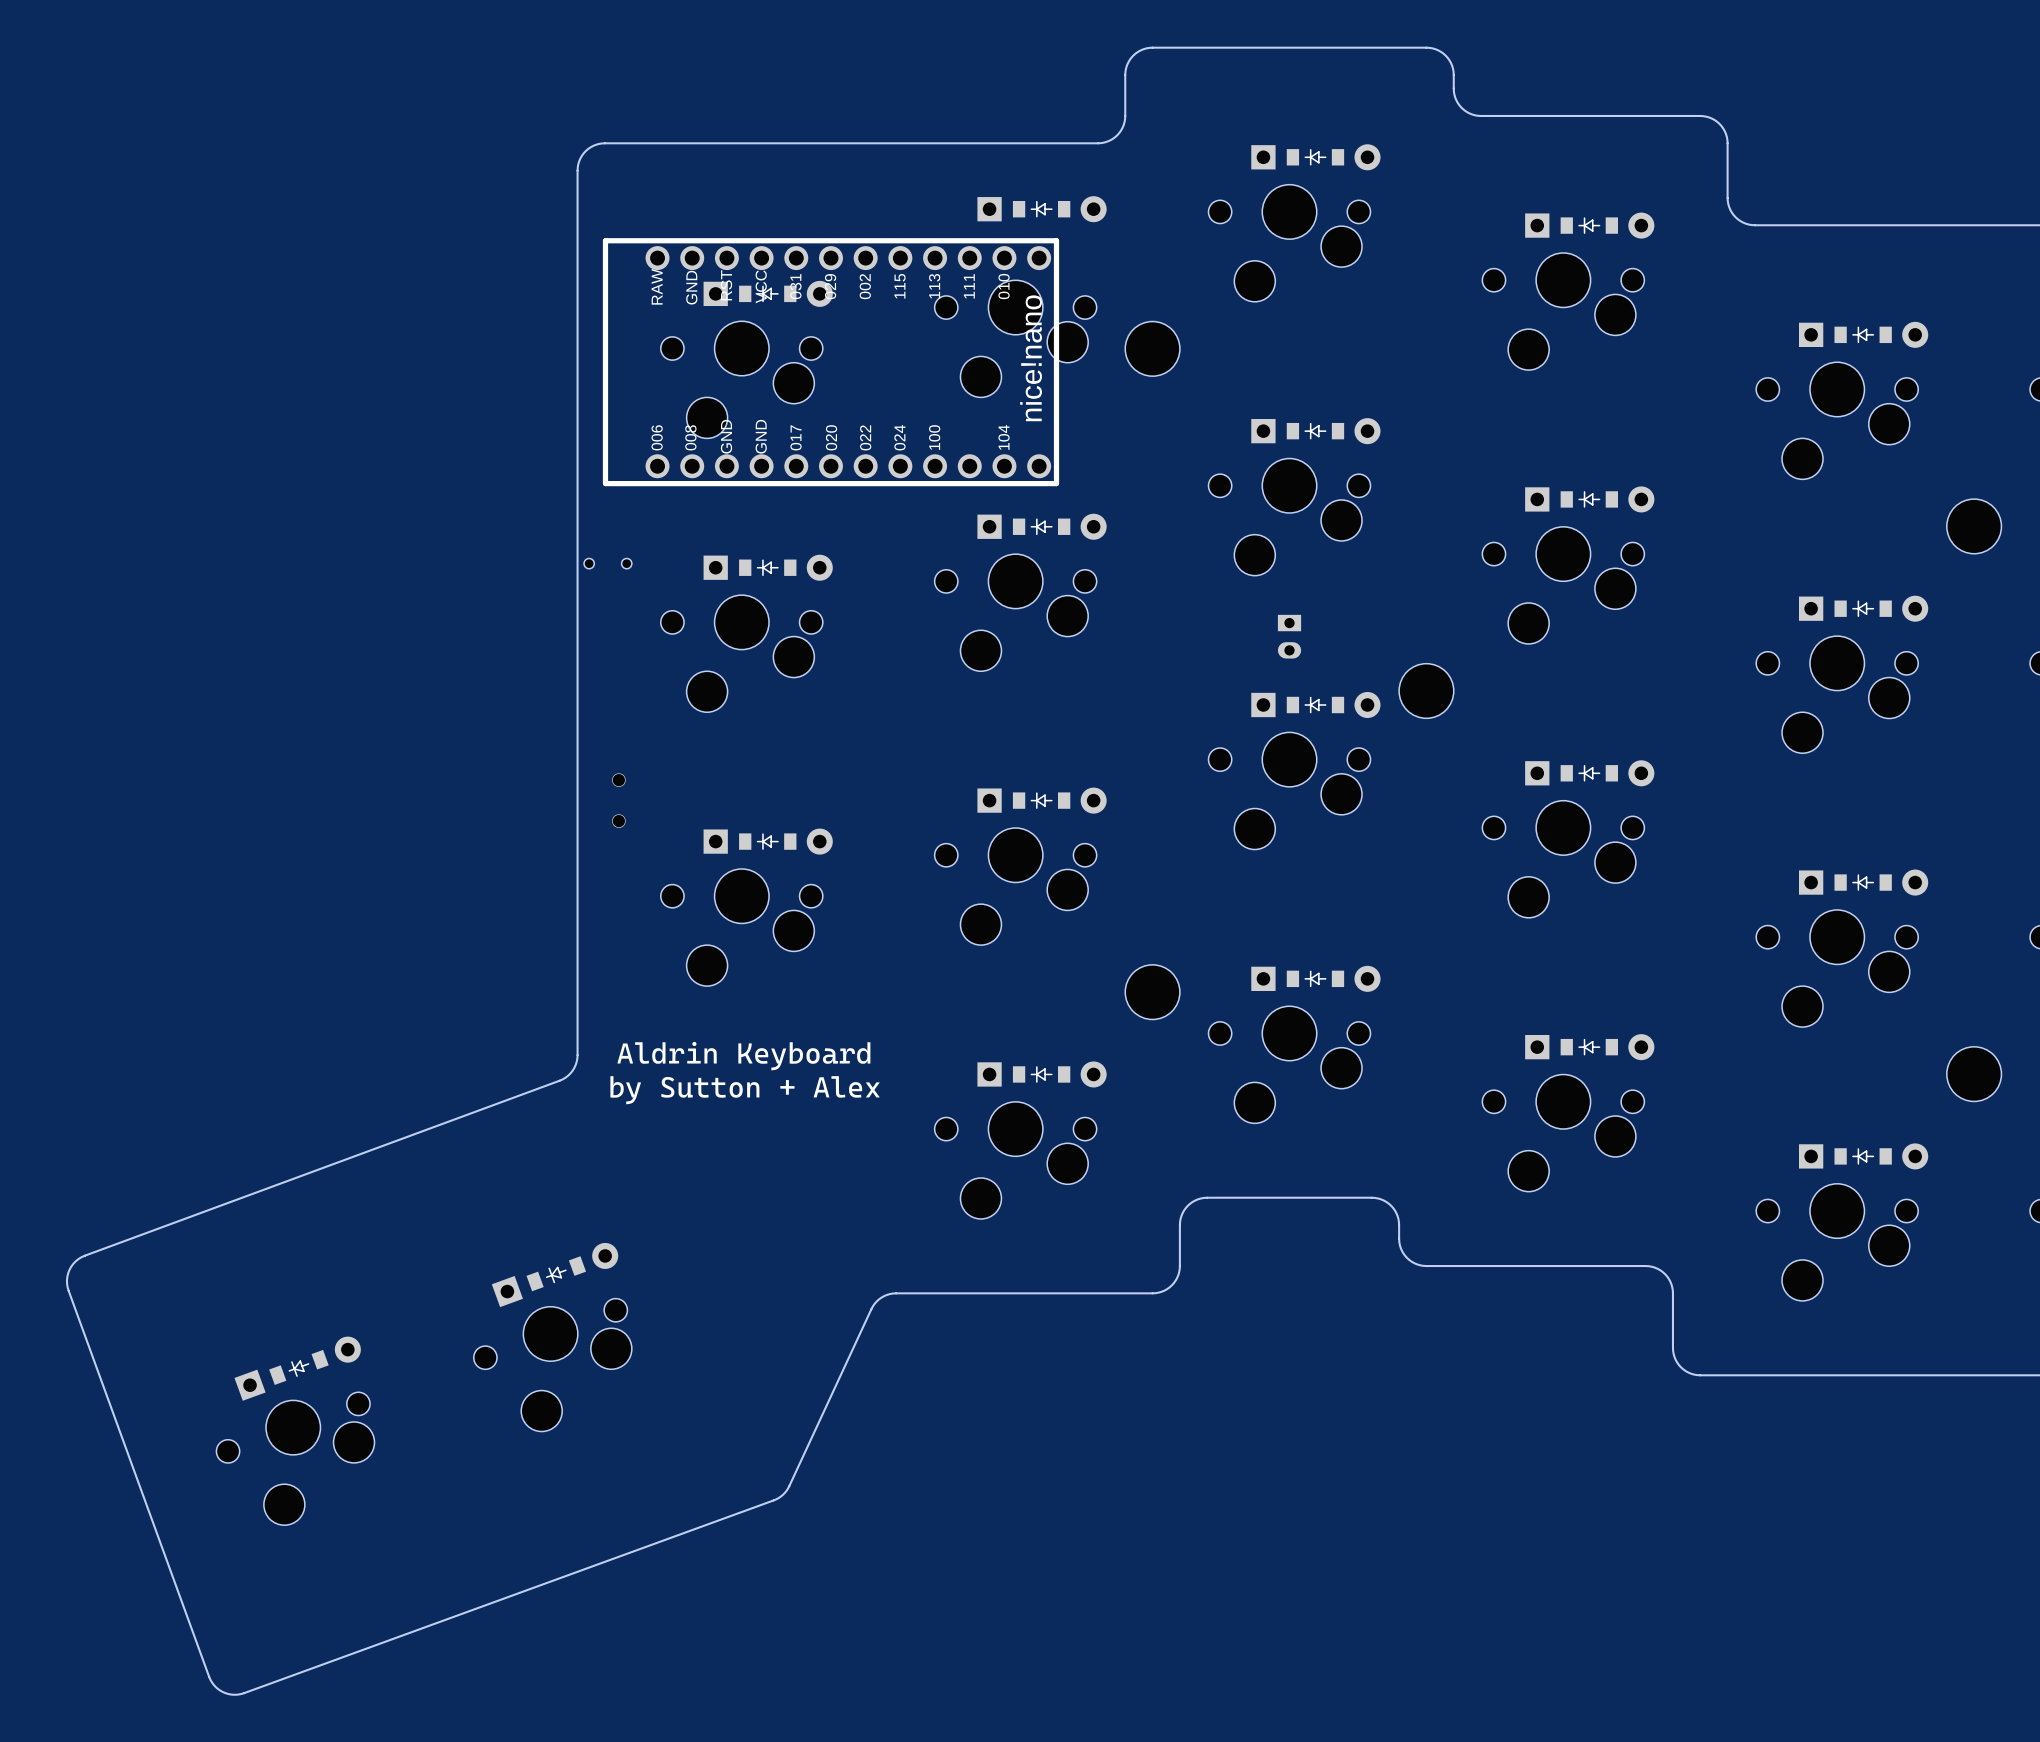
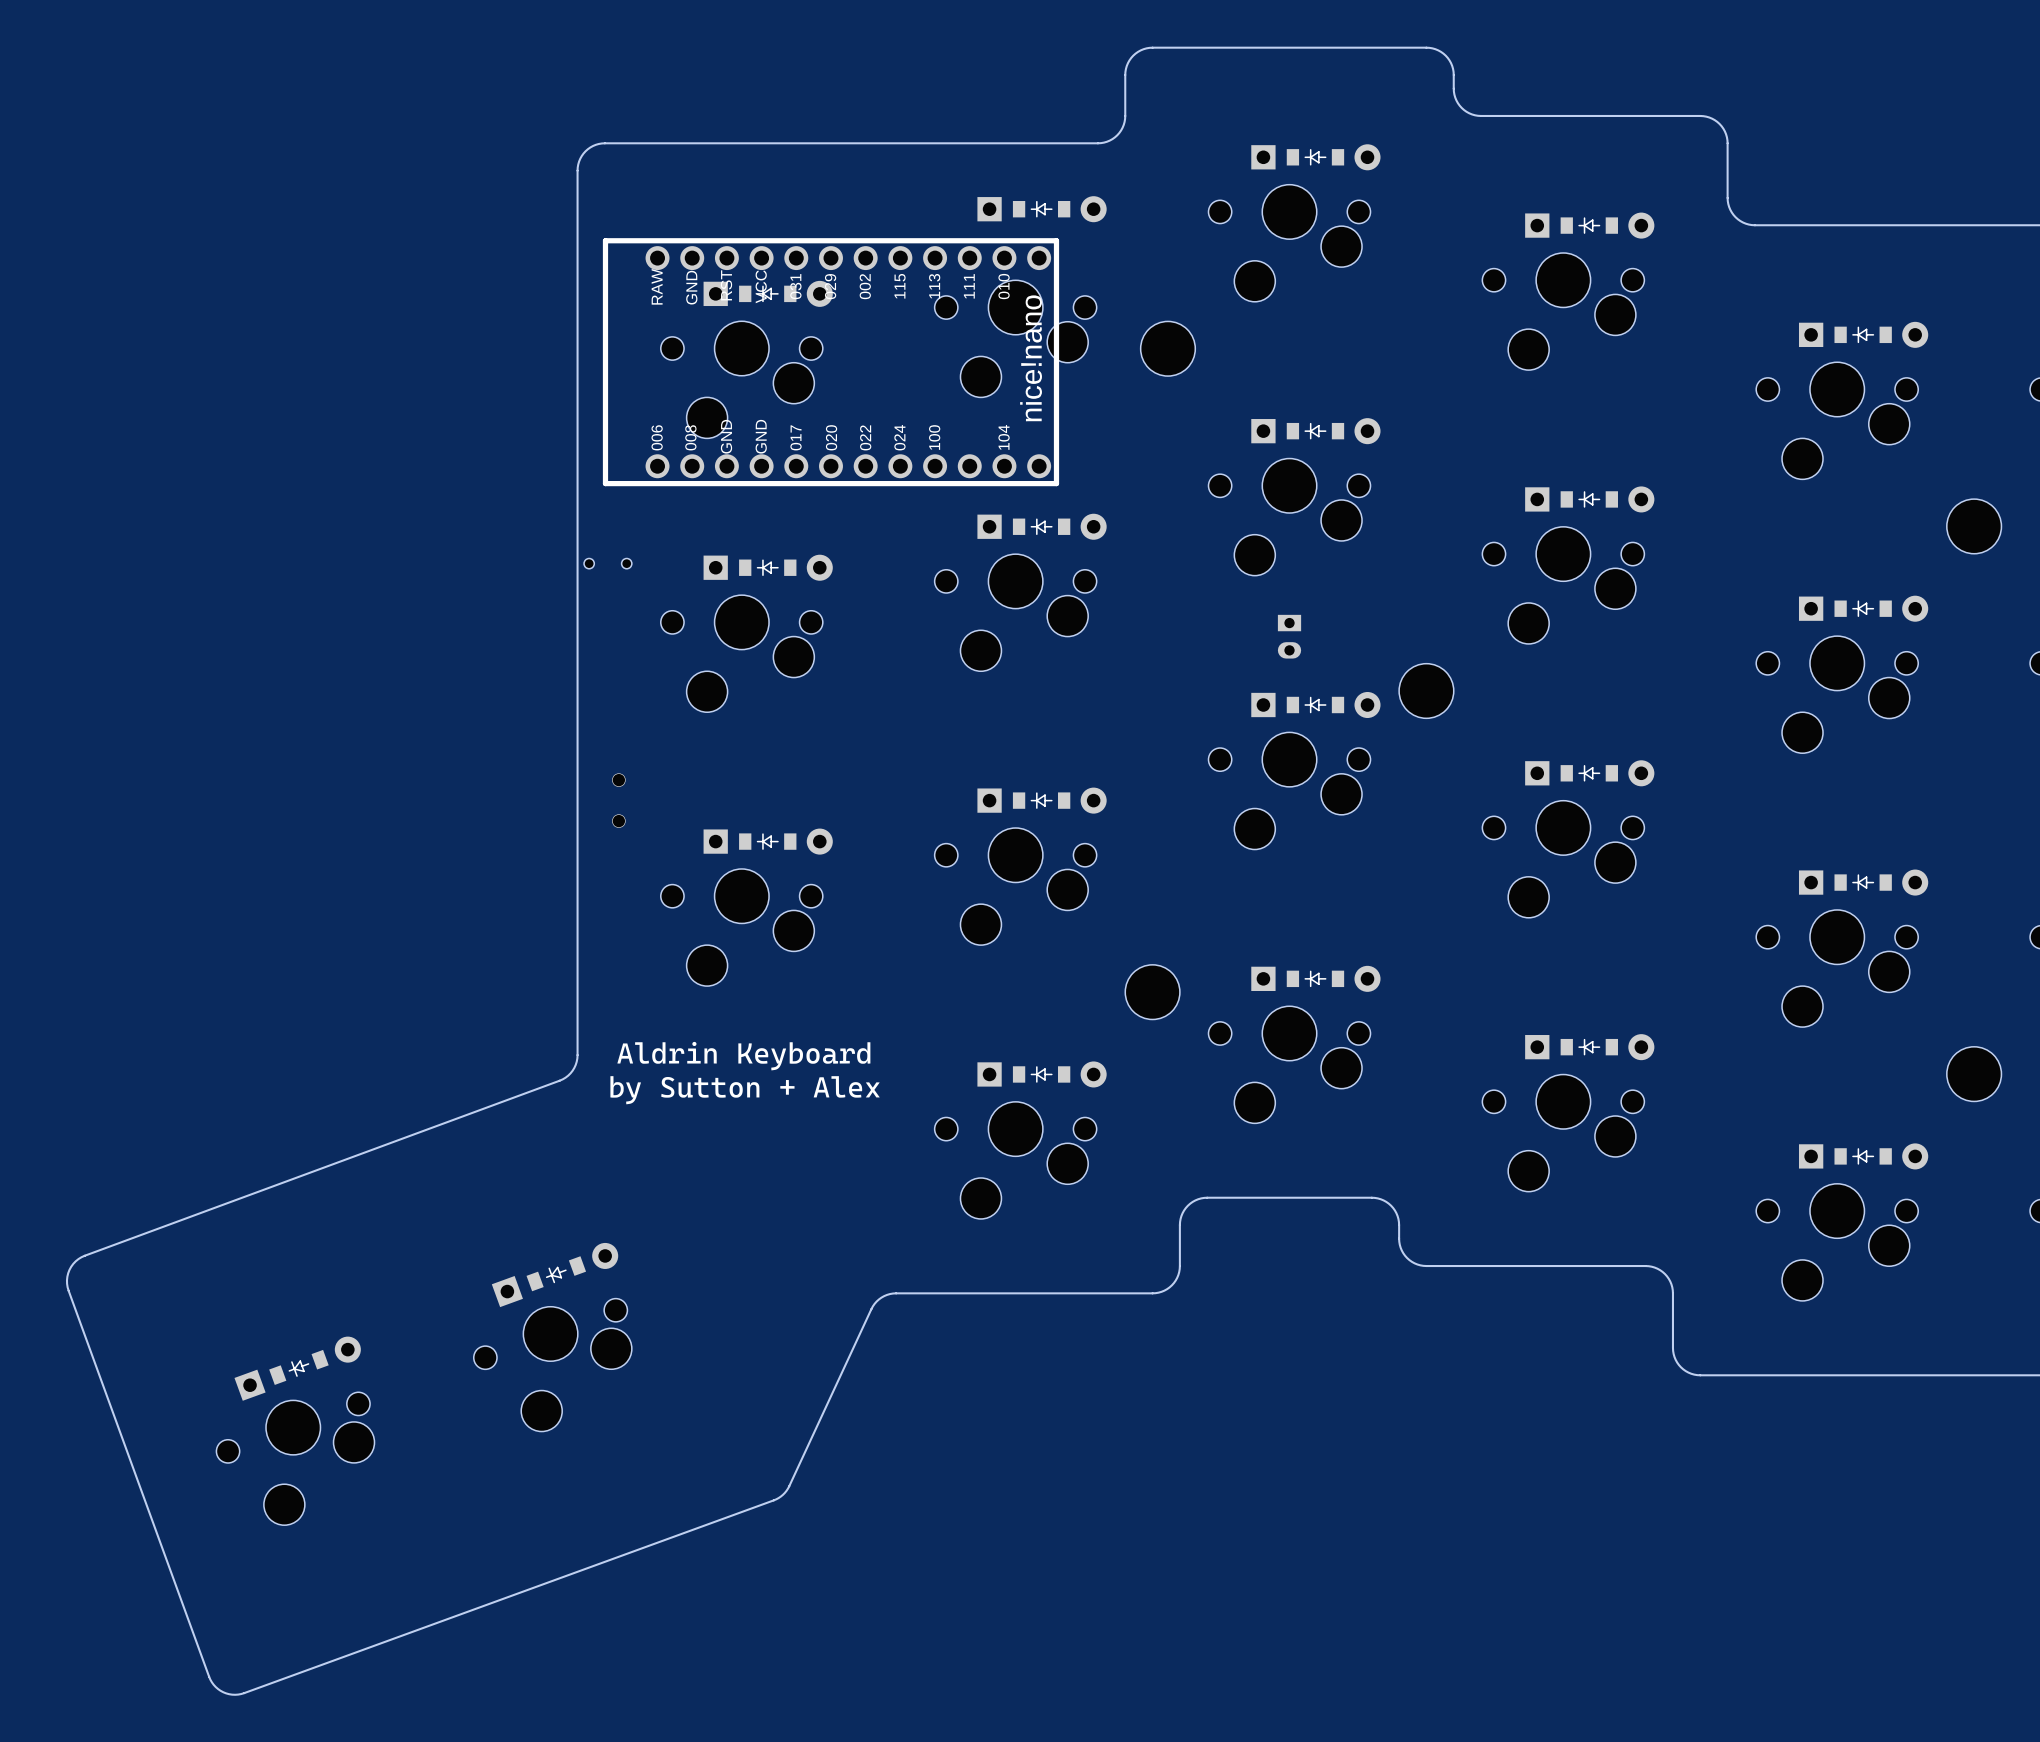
part position: (1152, 348) -> (1167, 348)

